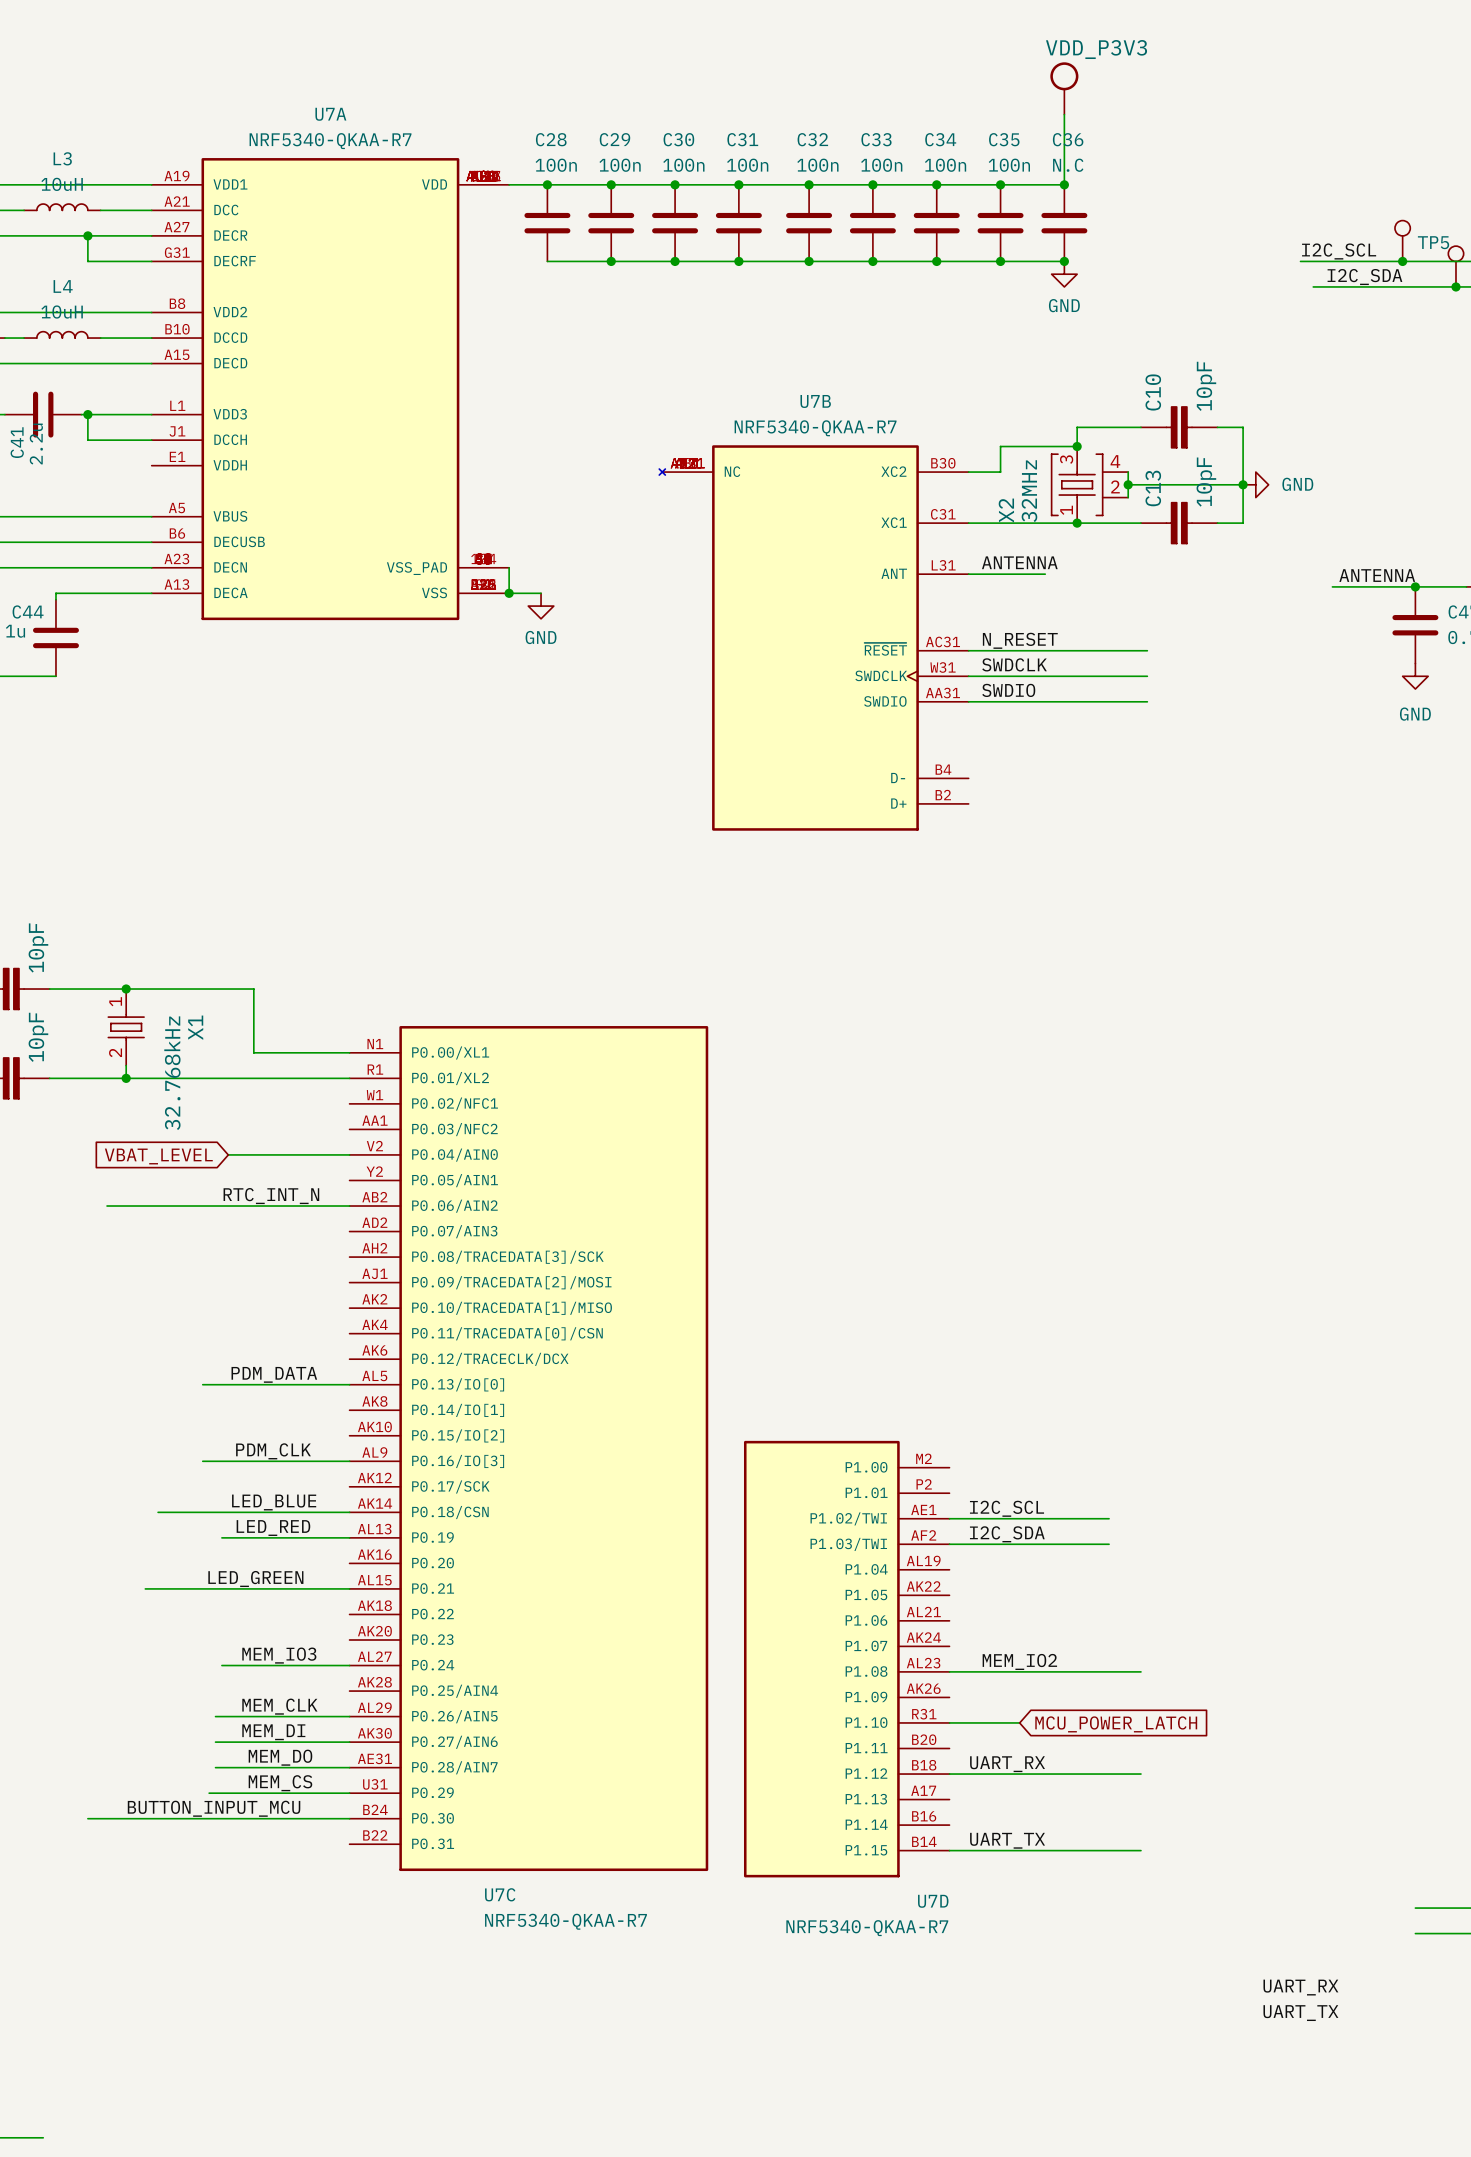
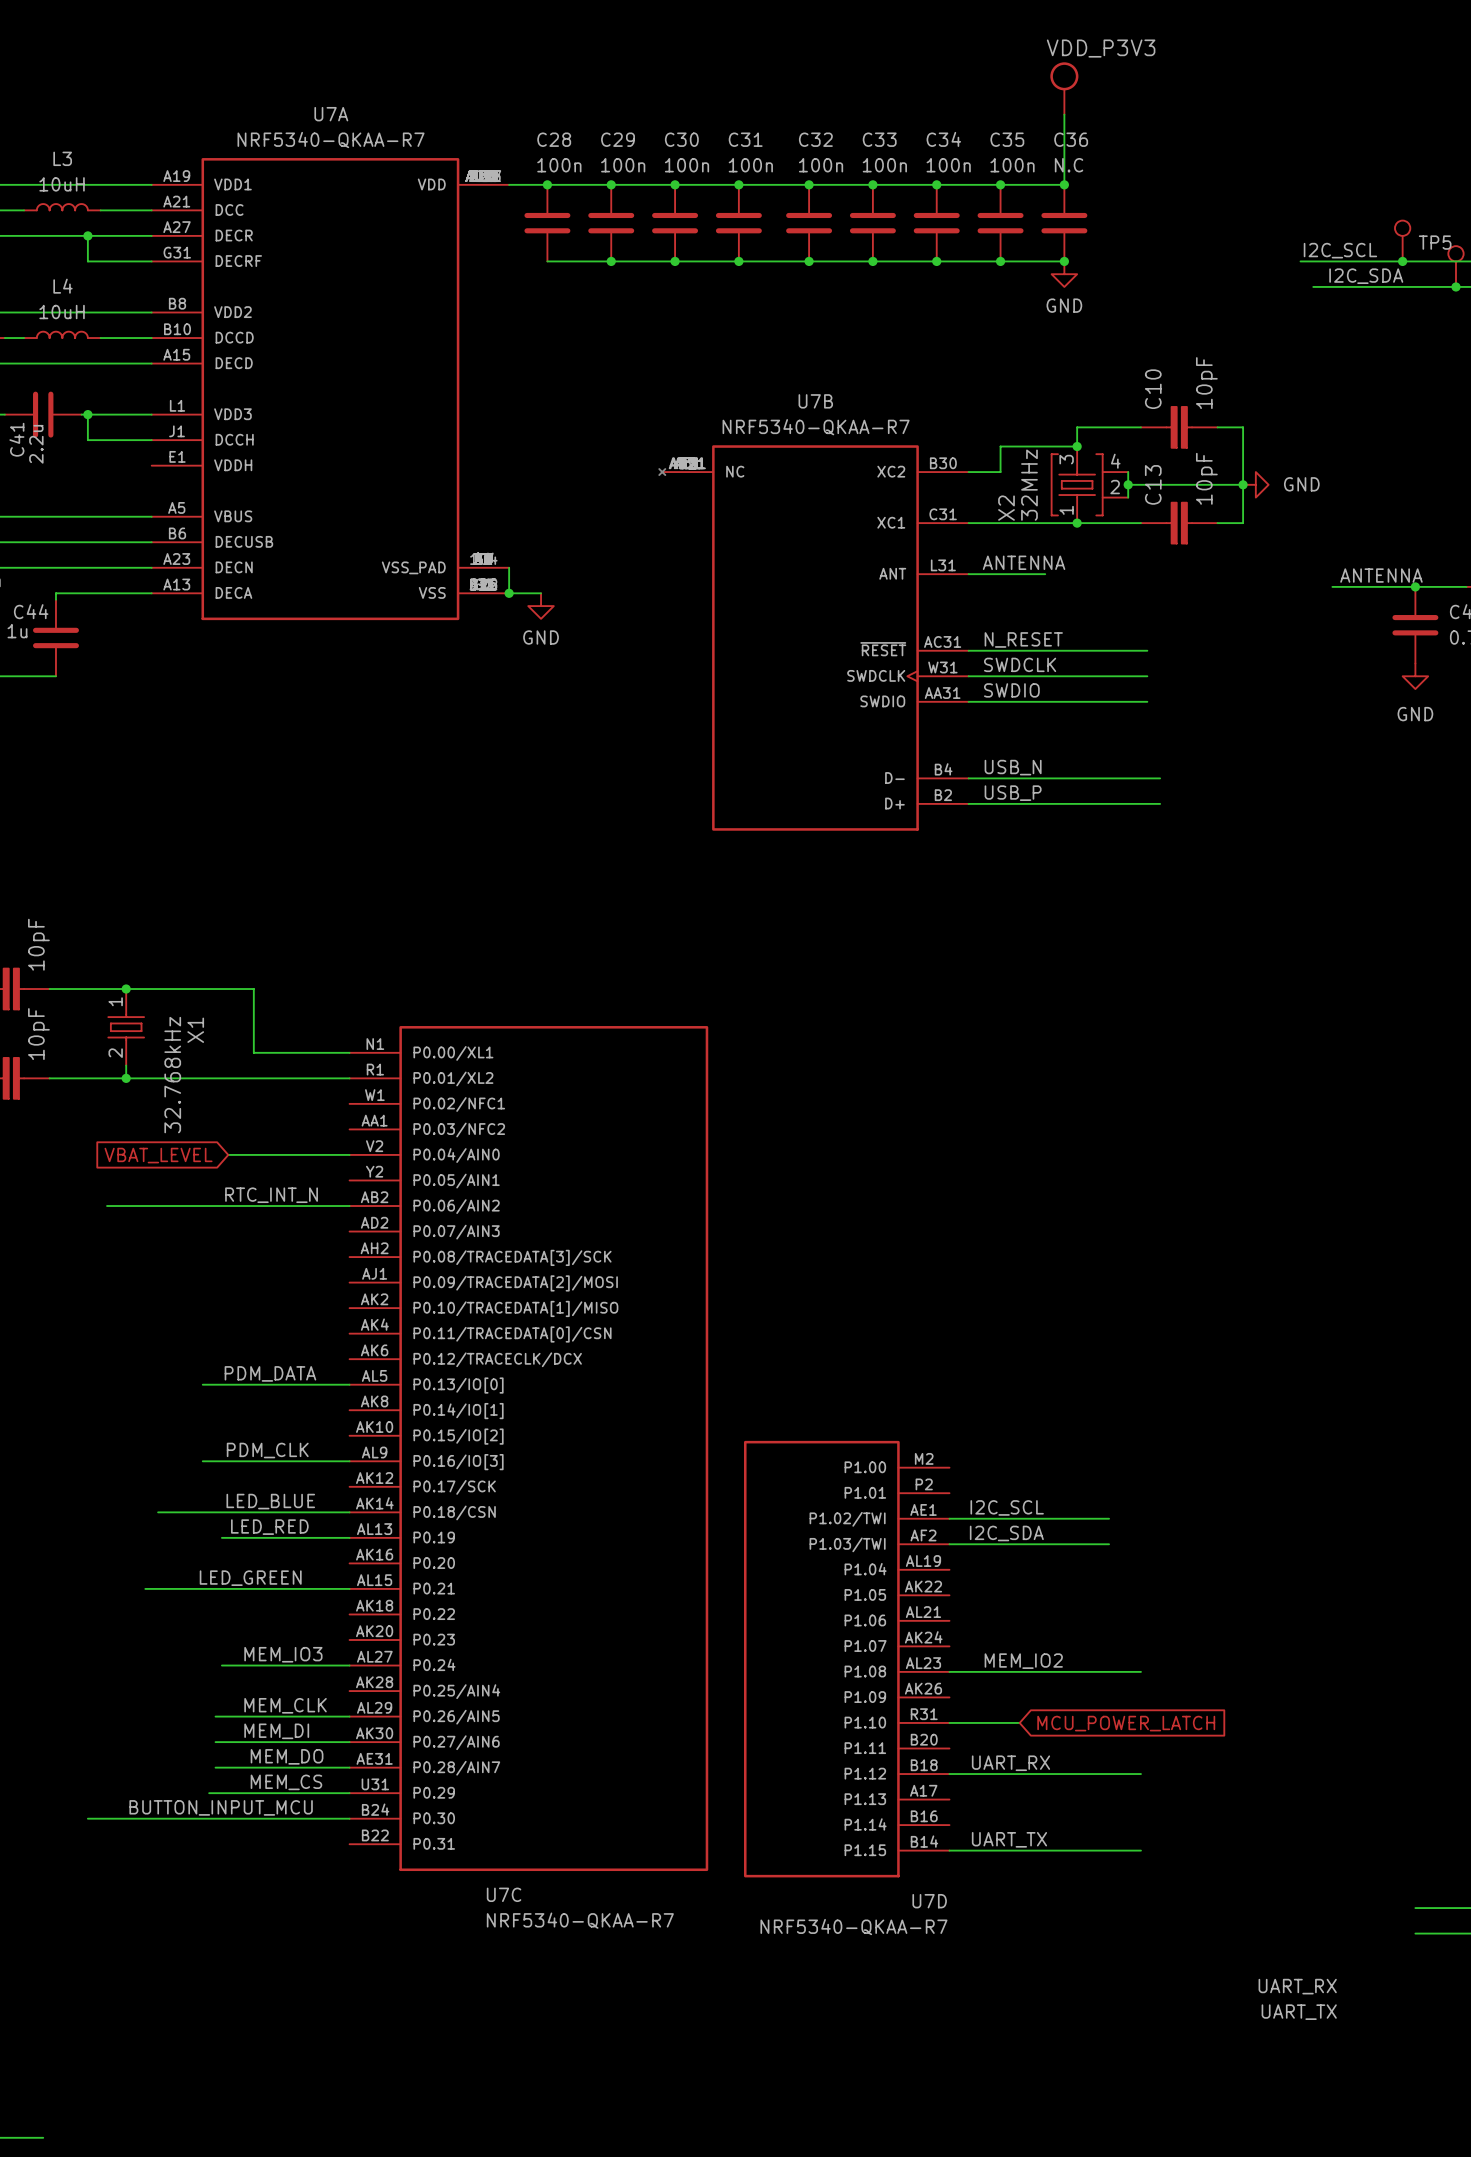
label: none -> USB_N (1013, 767)
wire: none -> (968, 778) (1160, 778)
label: none -> USB_P (1013, 793)
wire: none -> (968, 803) (1160, 803)

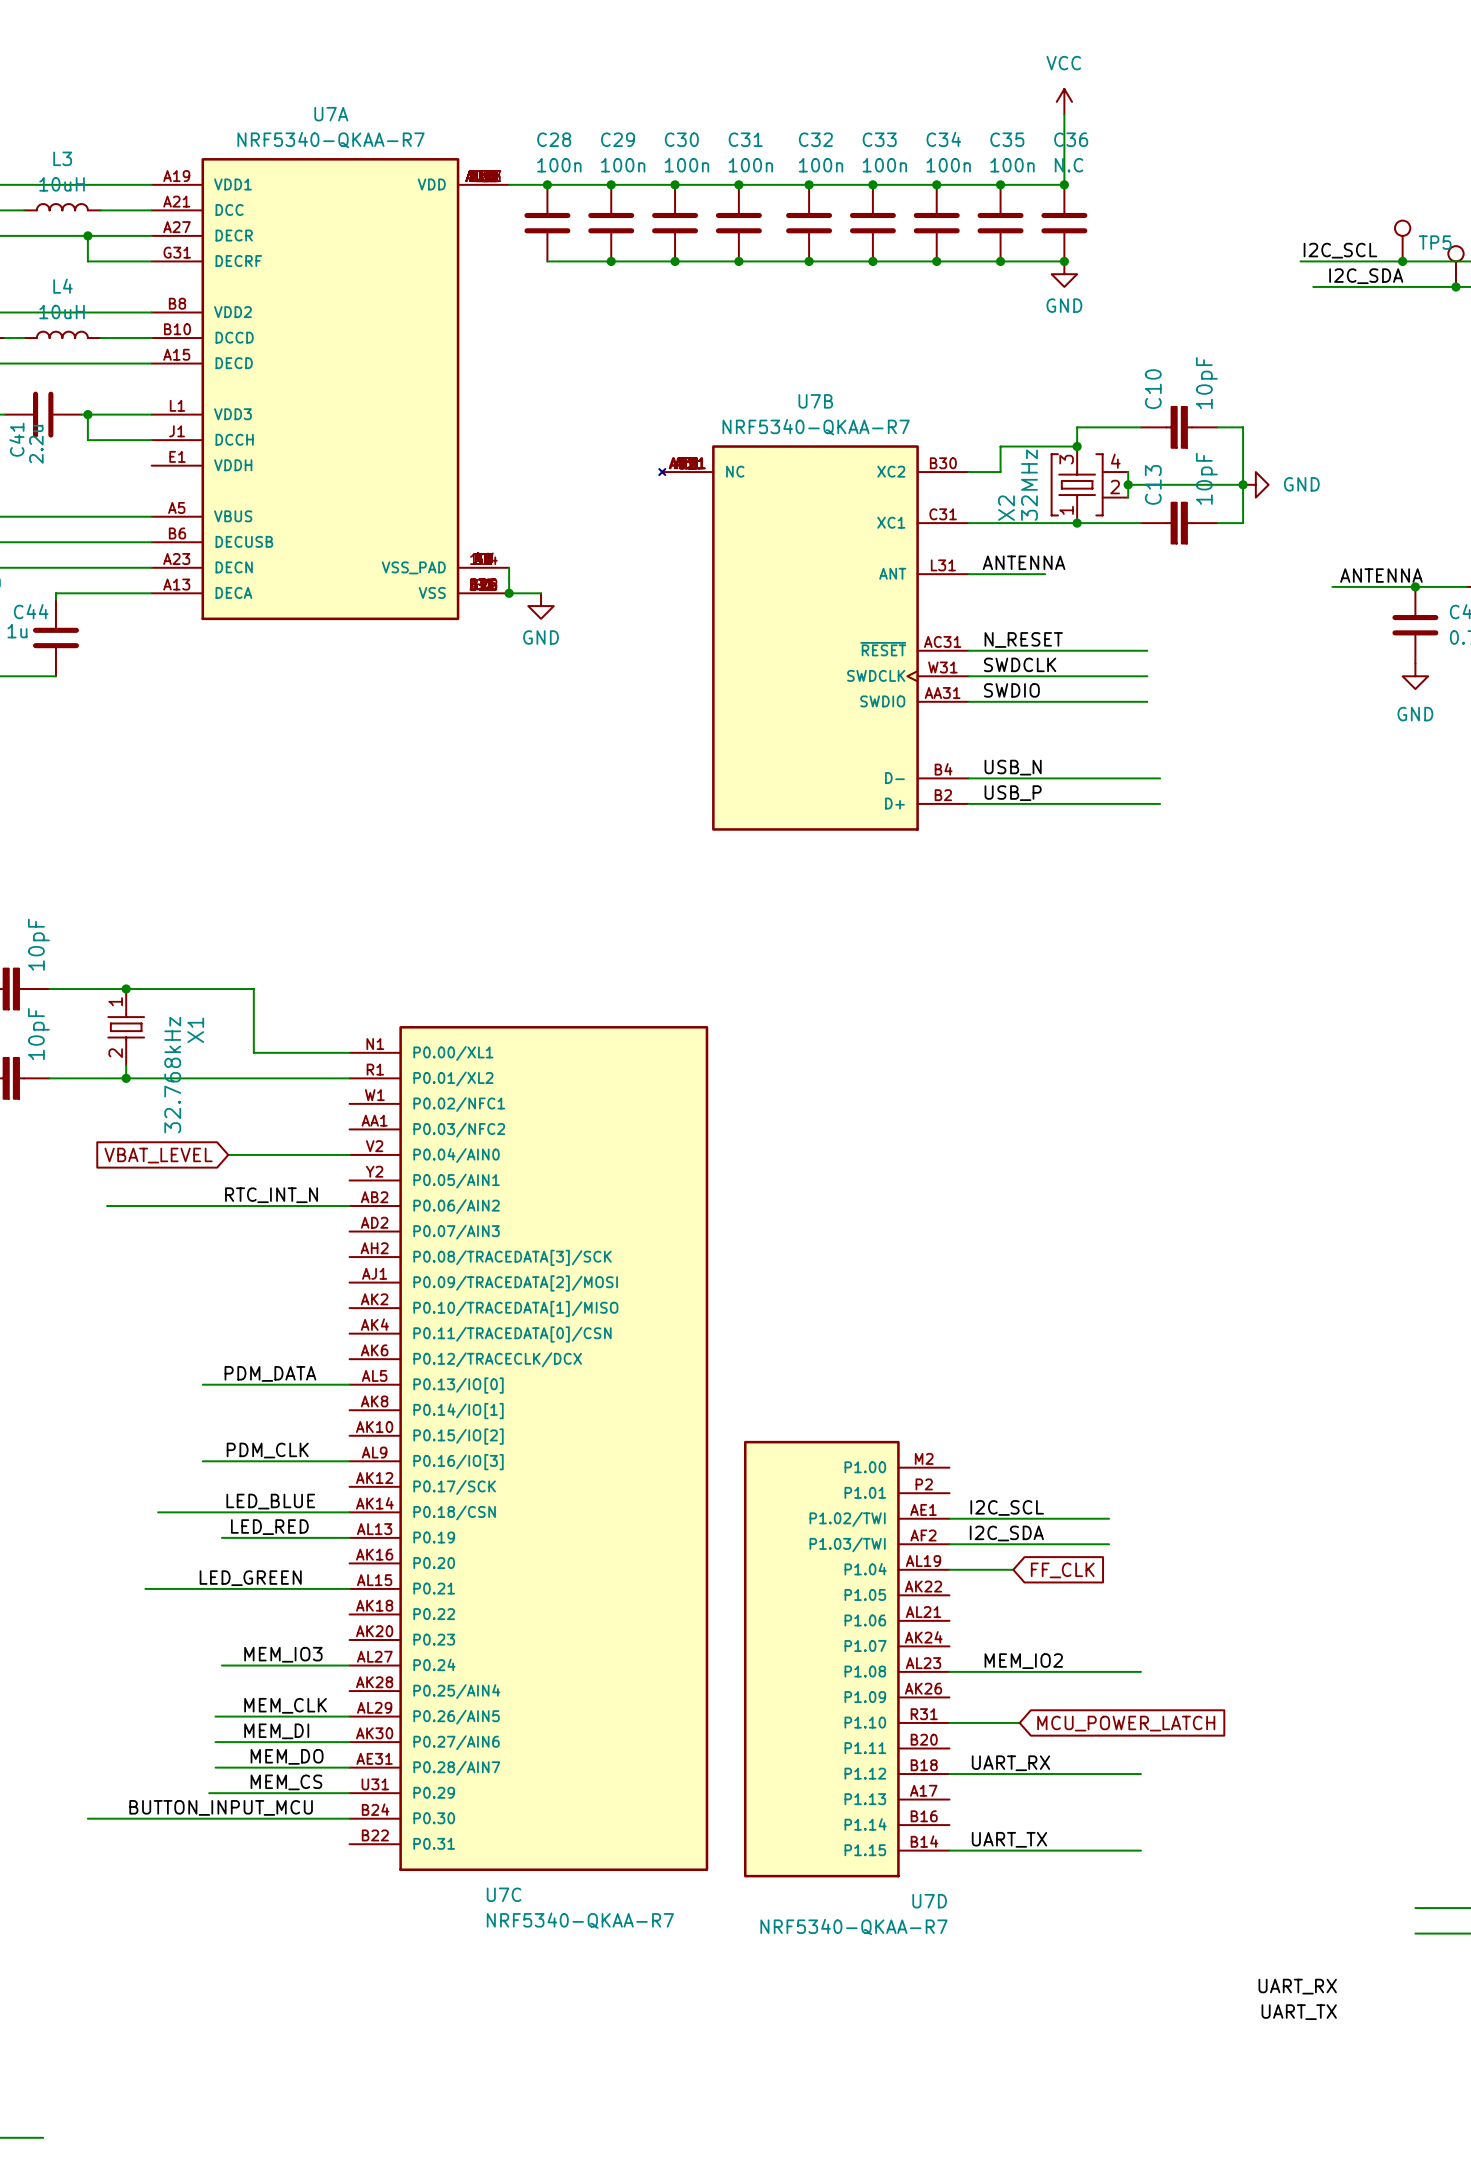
power symbol: VDD_P3V3 (1064, 88) -> none
power symbol: none -> VCC (1064, 101)
wire: none -> (949, 1569) (1013, 1569)
global label: none -> FF_CLK (1062, 1570)

